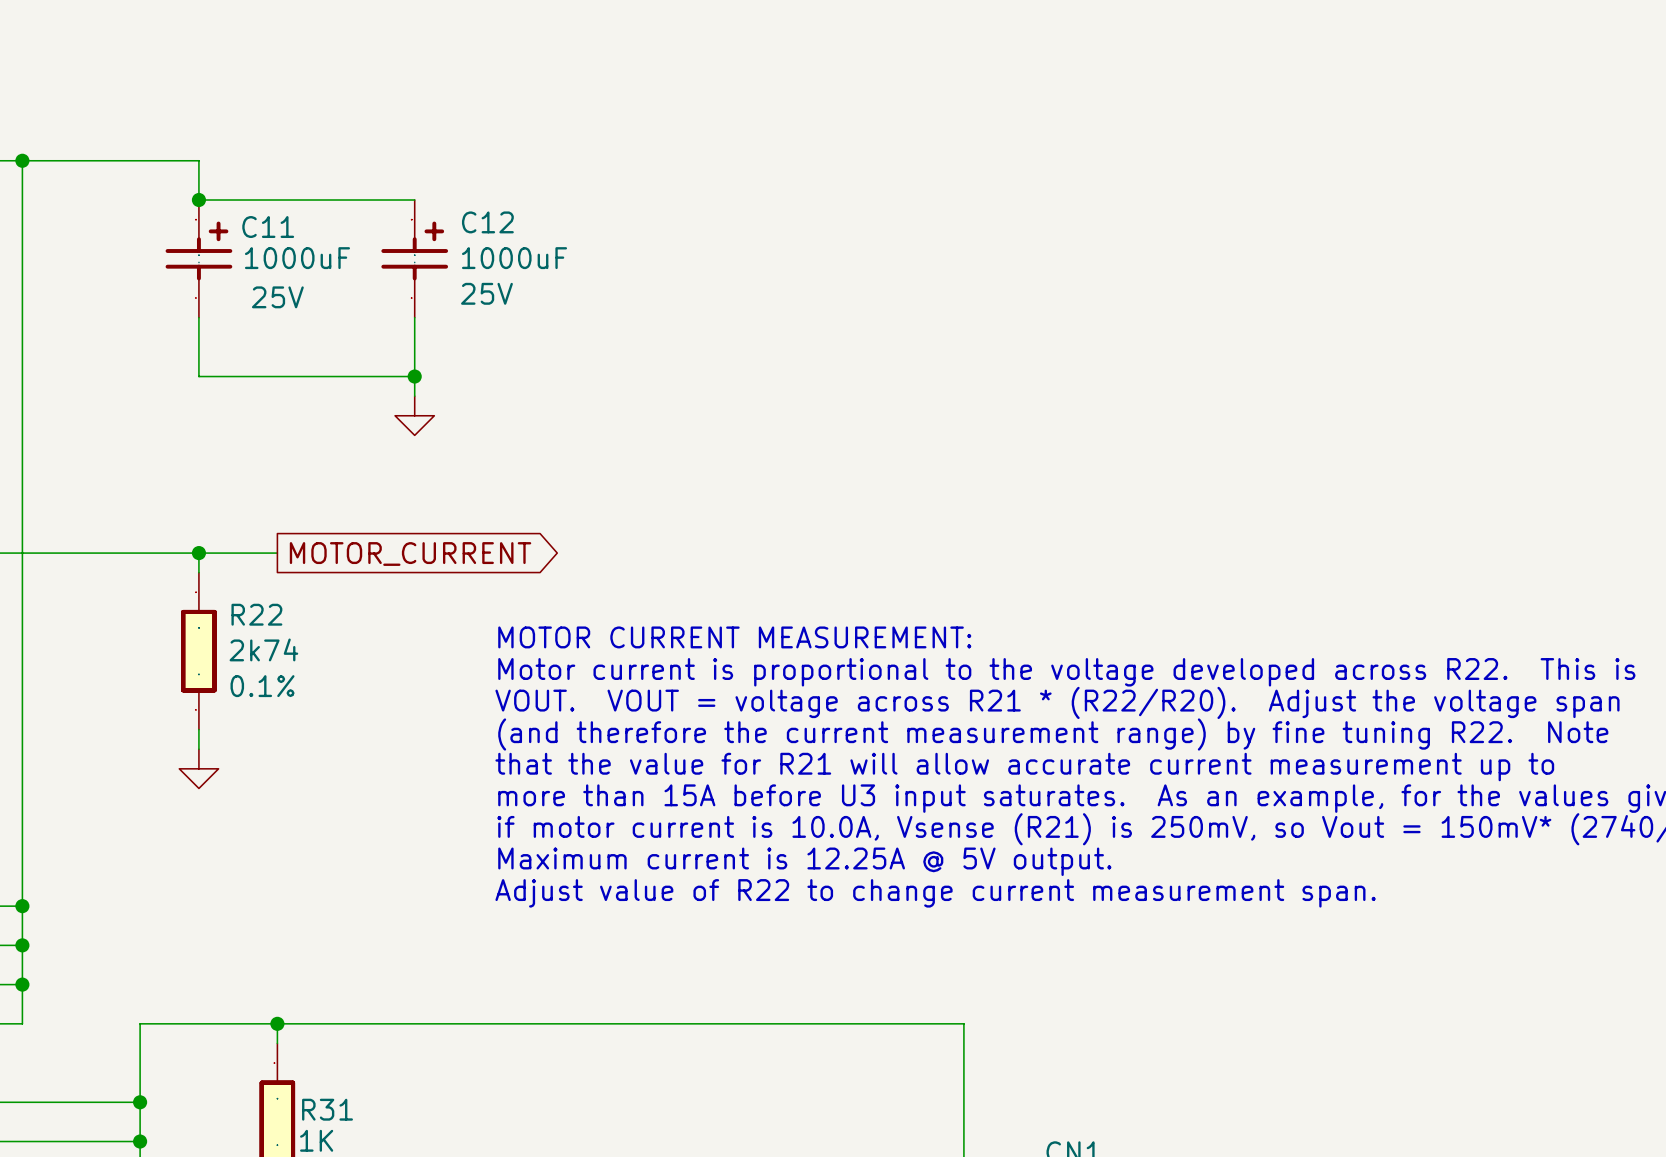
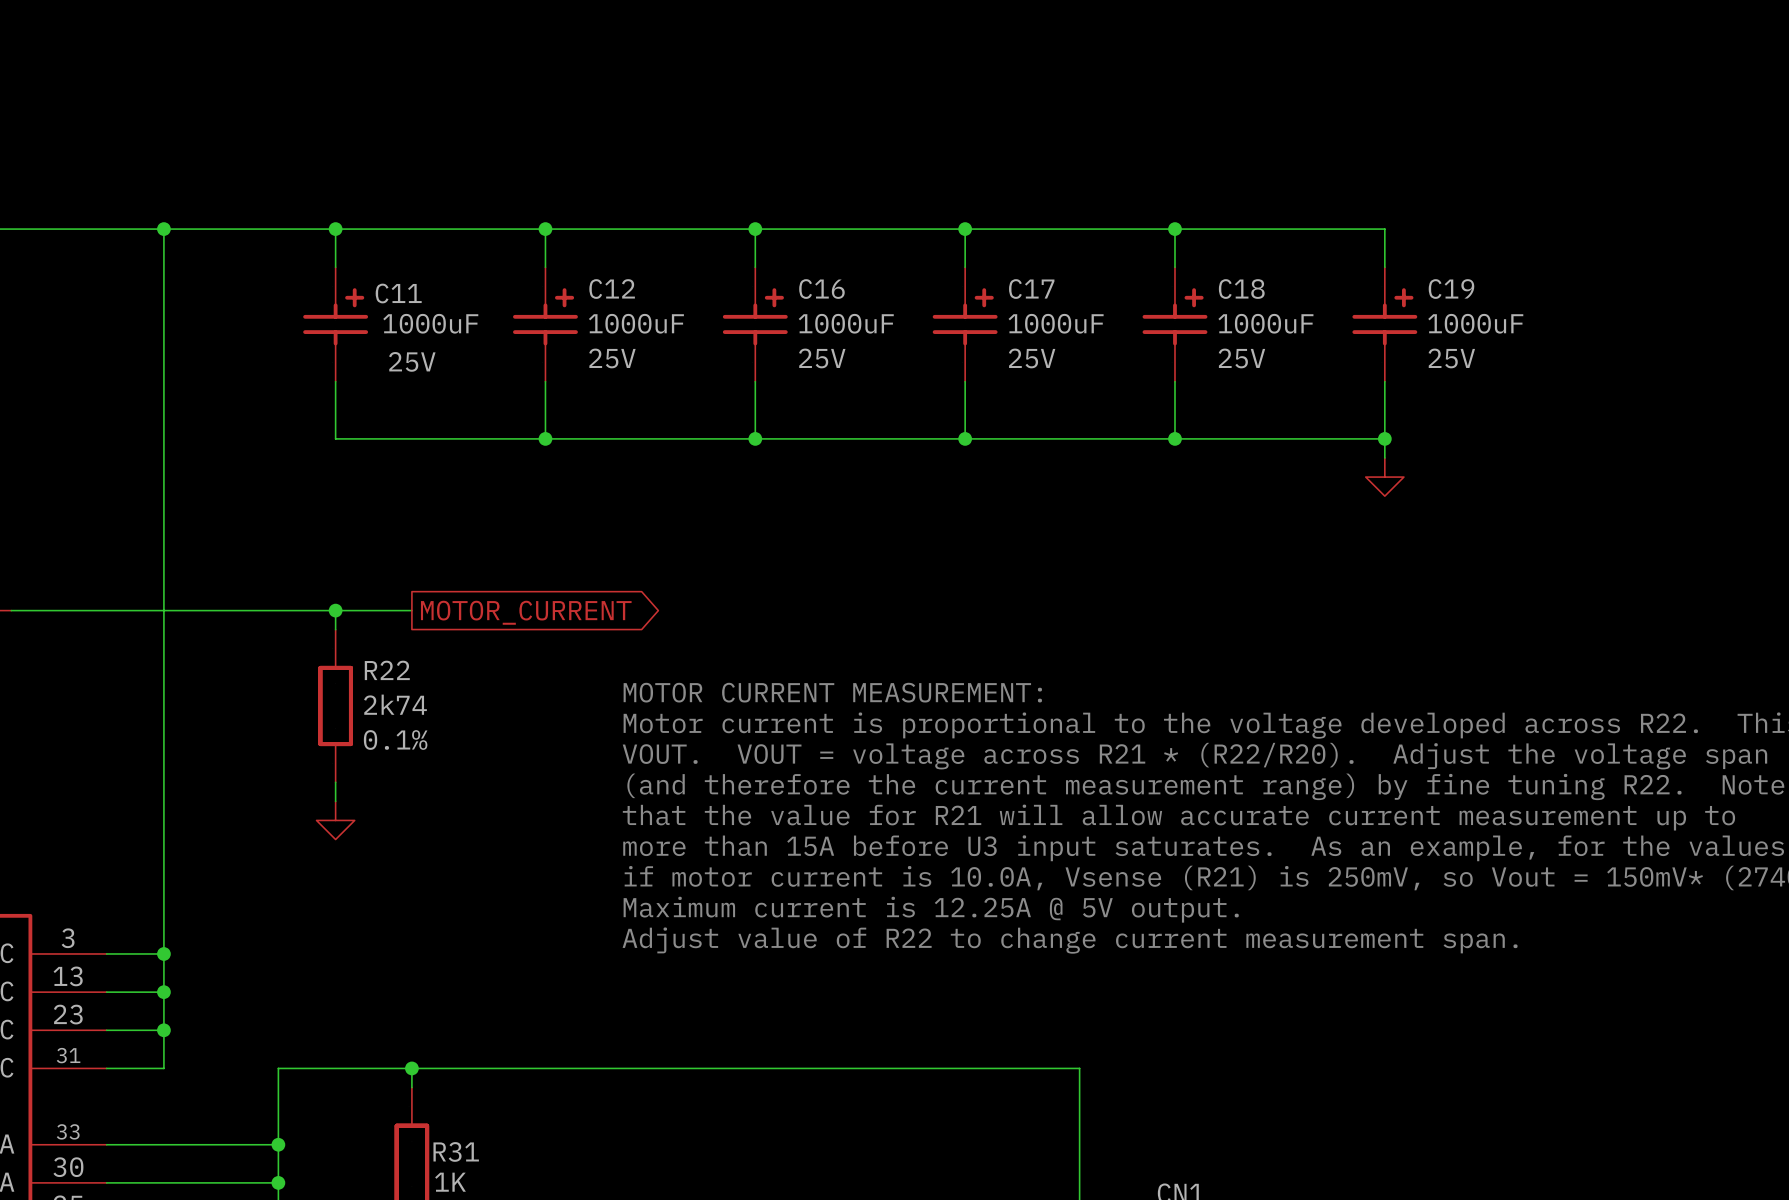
wire: none -> (335, 229) (1384, 229) (1384, 267)
junction: none -> (545, 229)
wire: none -> (755, 229) (755, 267)
junction: none -> (755, 229)
wire: none -> (965, 229) (965, 267)
junction: none -> (965, 229)
wire: none -> (1174, 229) (1174, 267)
junction: none -> (1174, 229)
wire: (198, 200) (414, 200) -> (545, 229) (545, 267)
junction position: (198, 200) -> (335, 229)
C16: none -> (755, 324)
C17: none -> (965, 324)
C18: none -> (1174, 324)
C19: none -> (1384, 324)
wire: none -> (755, 381) (755, 438)
wire: none -> (965, 381) (965, 438)
wire: none -> (1174, 381) (1174, 438)
wire: none -> (1384, 381) (1384, 457)
wire: (414, 376) (414, 396) -> (545, 438) (1384, 438)
junction: none -> (755, 438)
junction: none -> (965, 438)
junction: none -> (1174, 438)
junction: none -> (1384, 438)
power symbol: (414, 415) -> none
power symbol: none -> (1384, 477)

